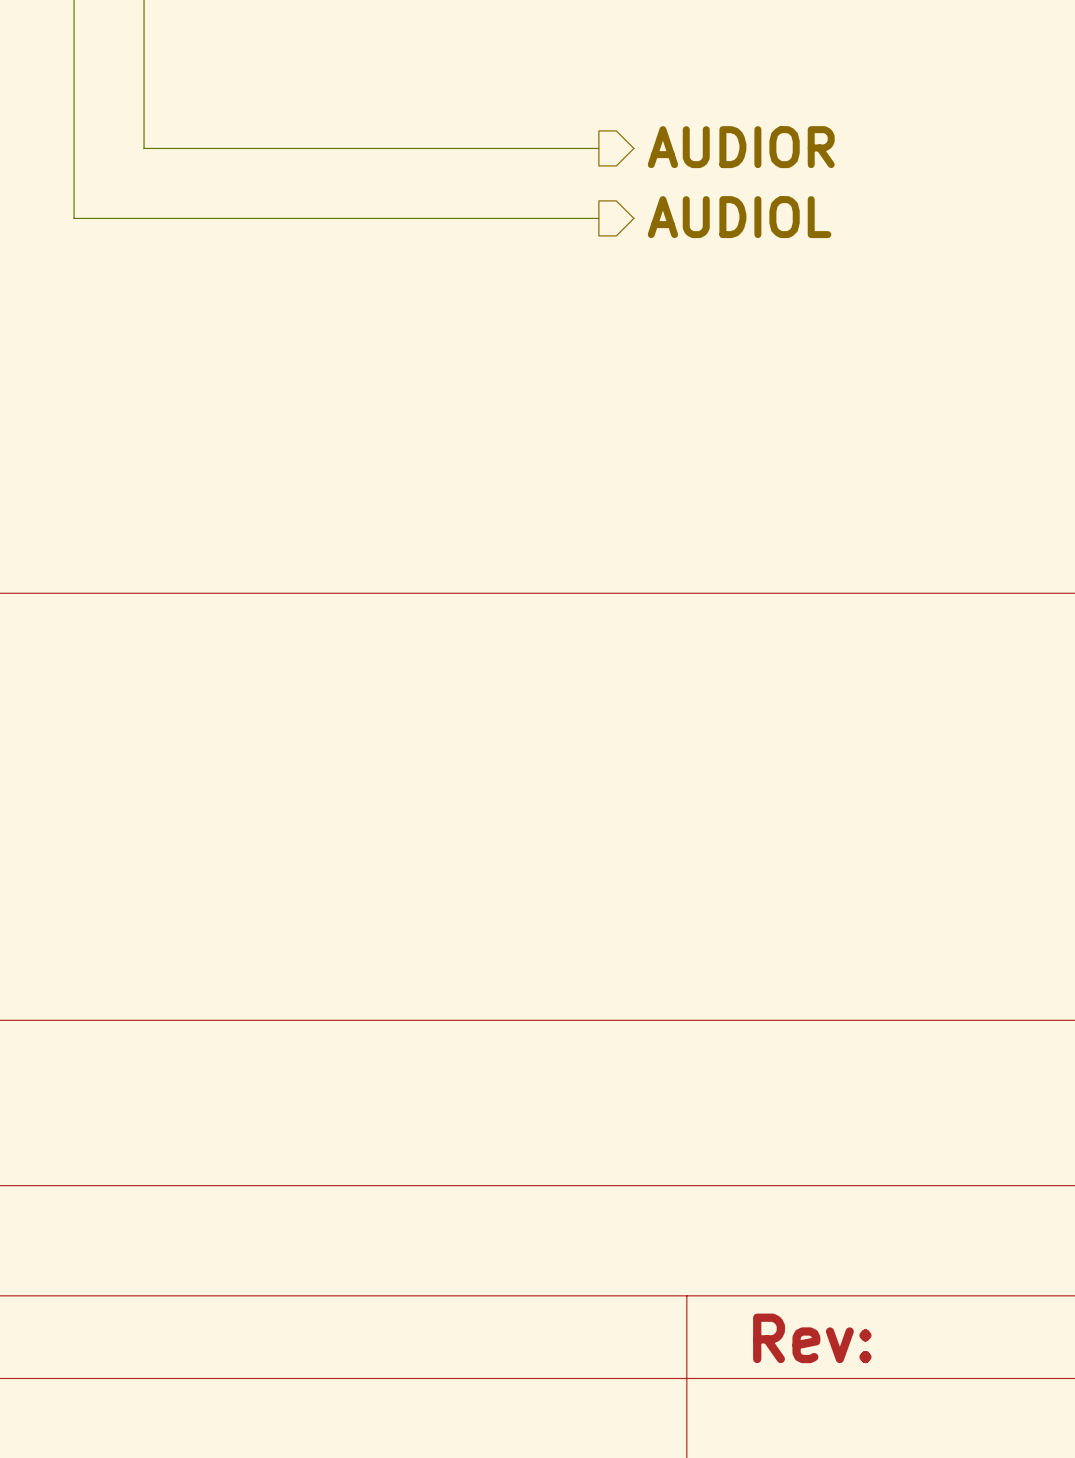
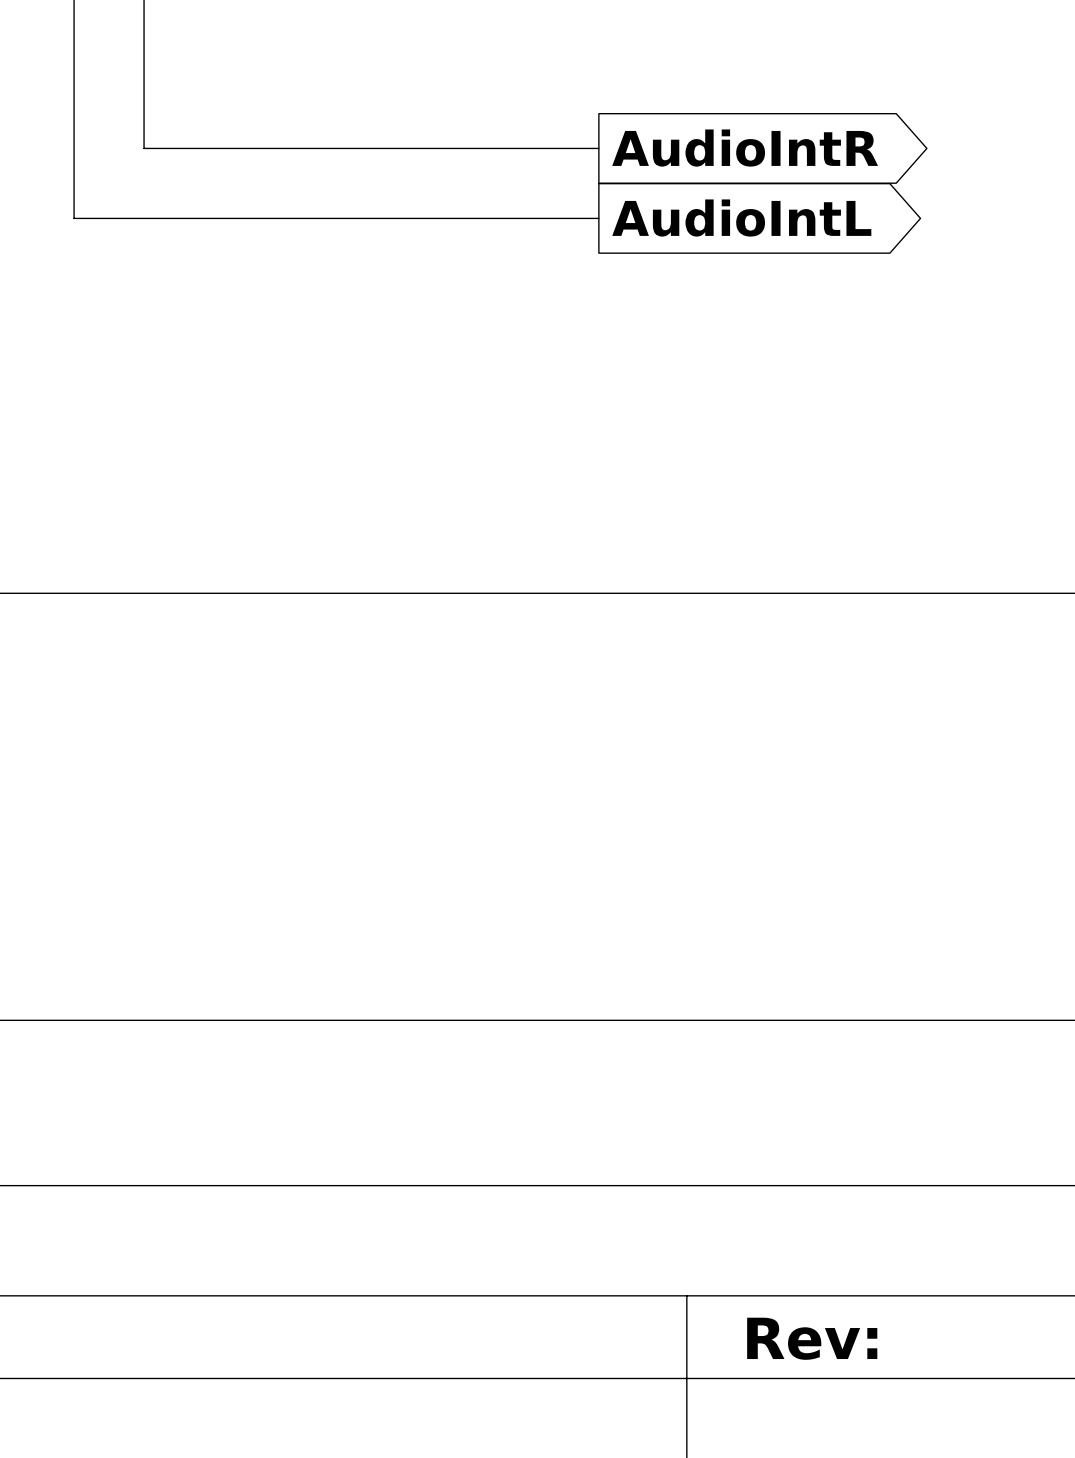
hierarchical label: AUDIOR (741, 147) -> none
global label: none -> AudioIntR (745, 148)
hierarchical label: AUDIOL (739, 217) -> none
global label: none -> AudioIntL (741, 218)

